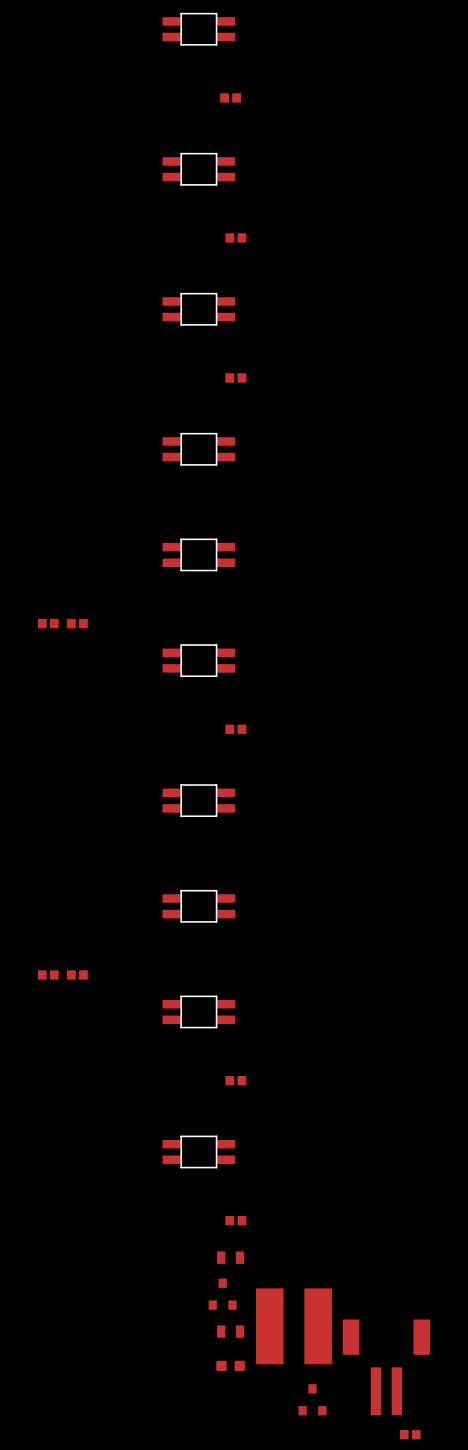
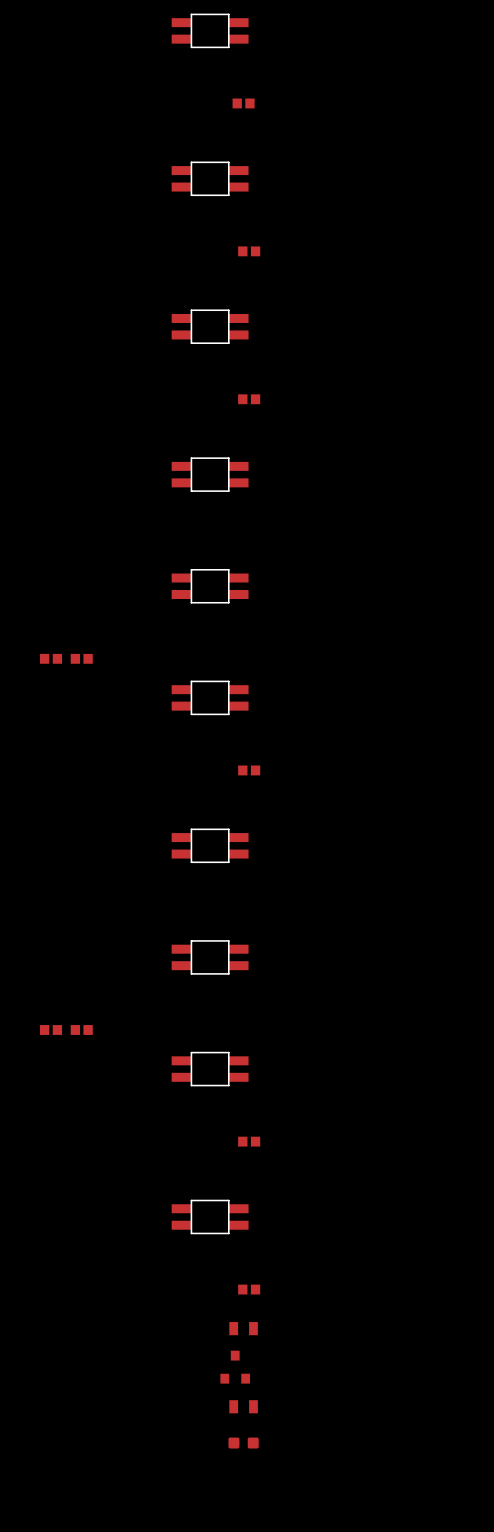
part: (293, 1326) -> none
part: (386, 1367) -> none
part: (312, 1399) -> none
part: (410, 1434) -> none

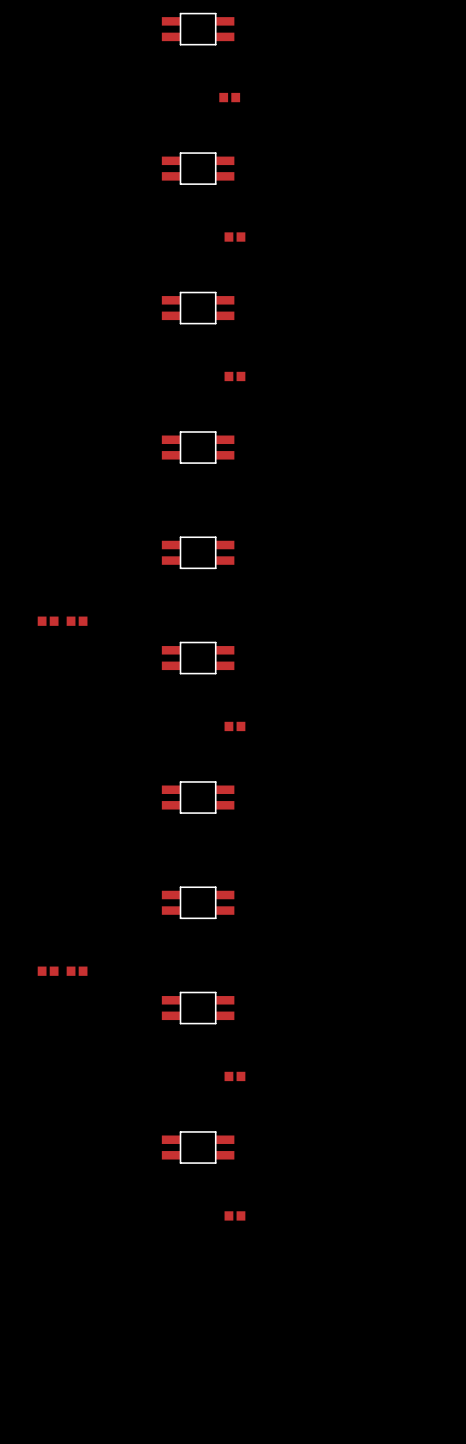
part: (243, 1328) -> none
part: (235, 1367) -> none
part: (243, 1406) -> none
part: (243, 1443) -> none

